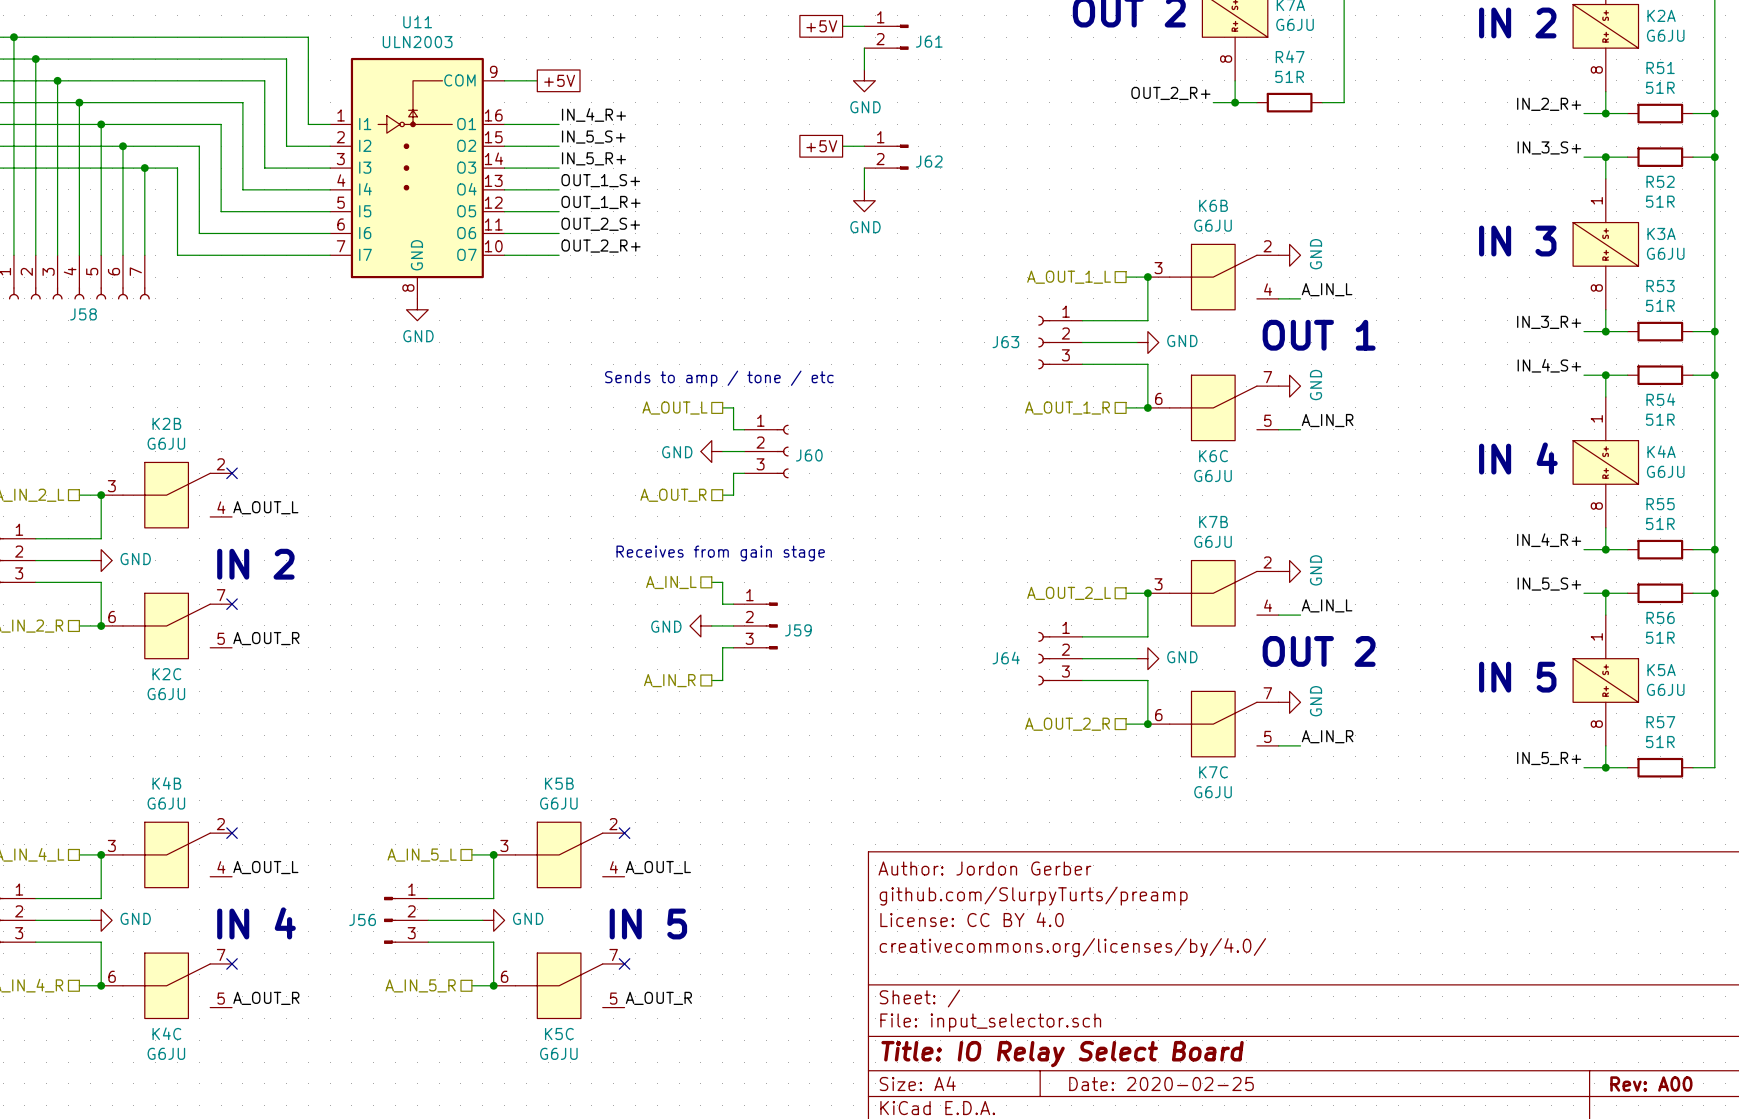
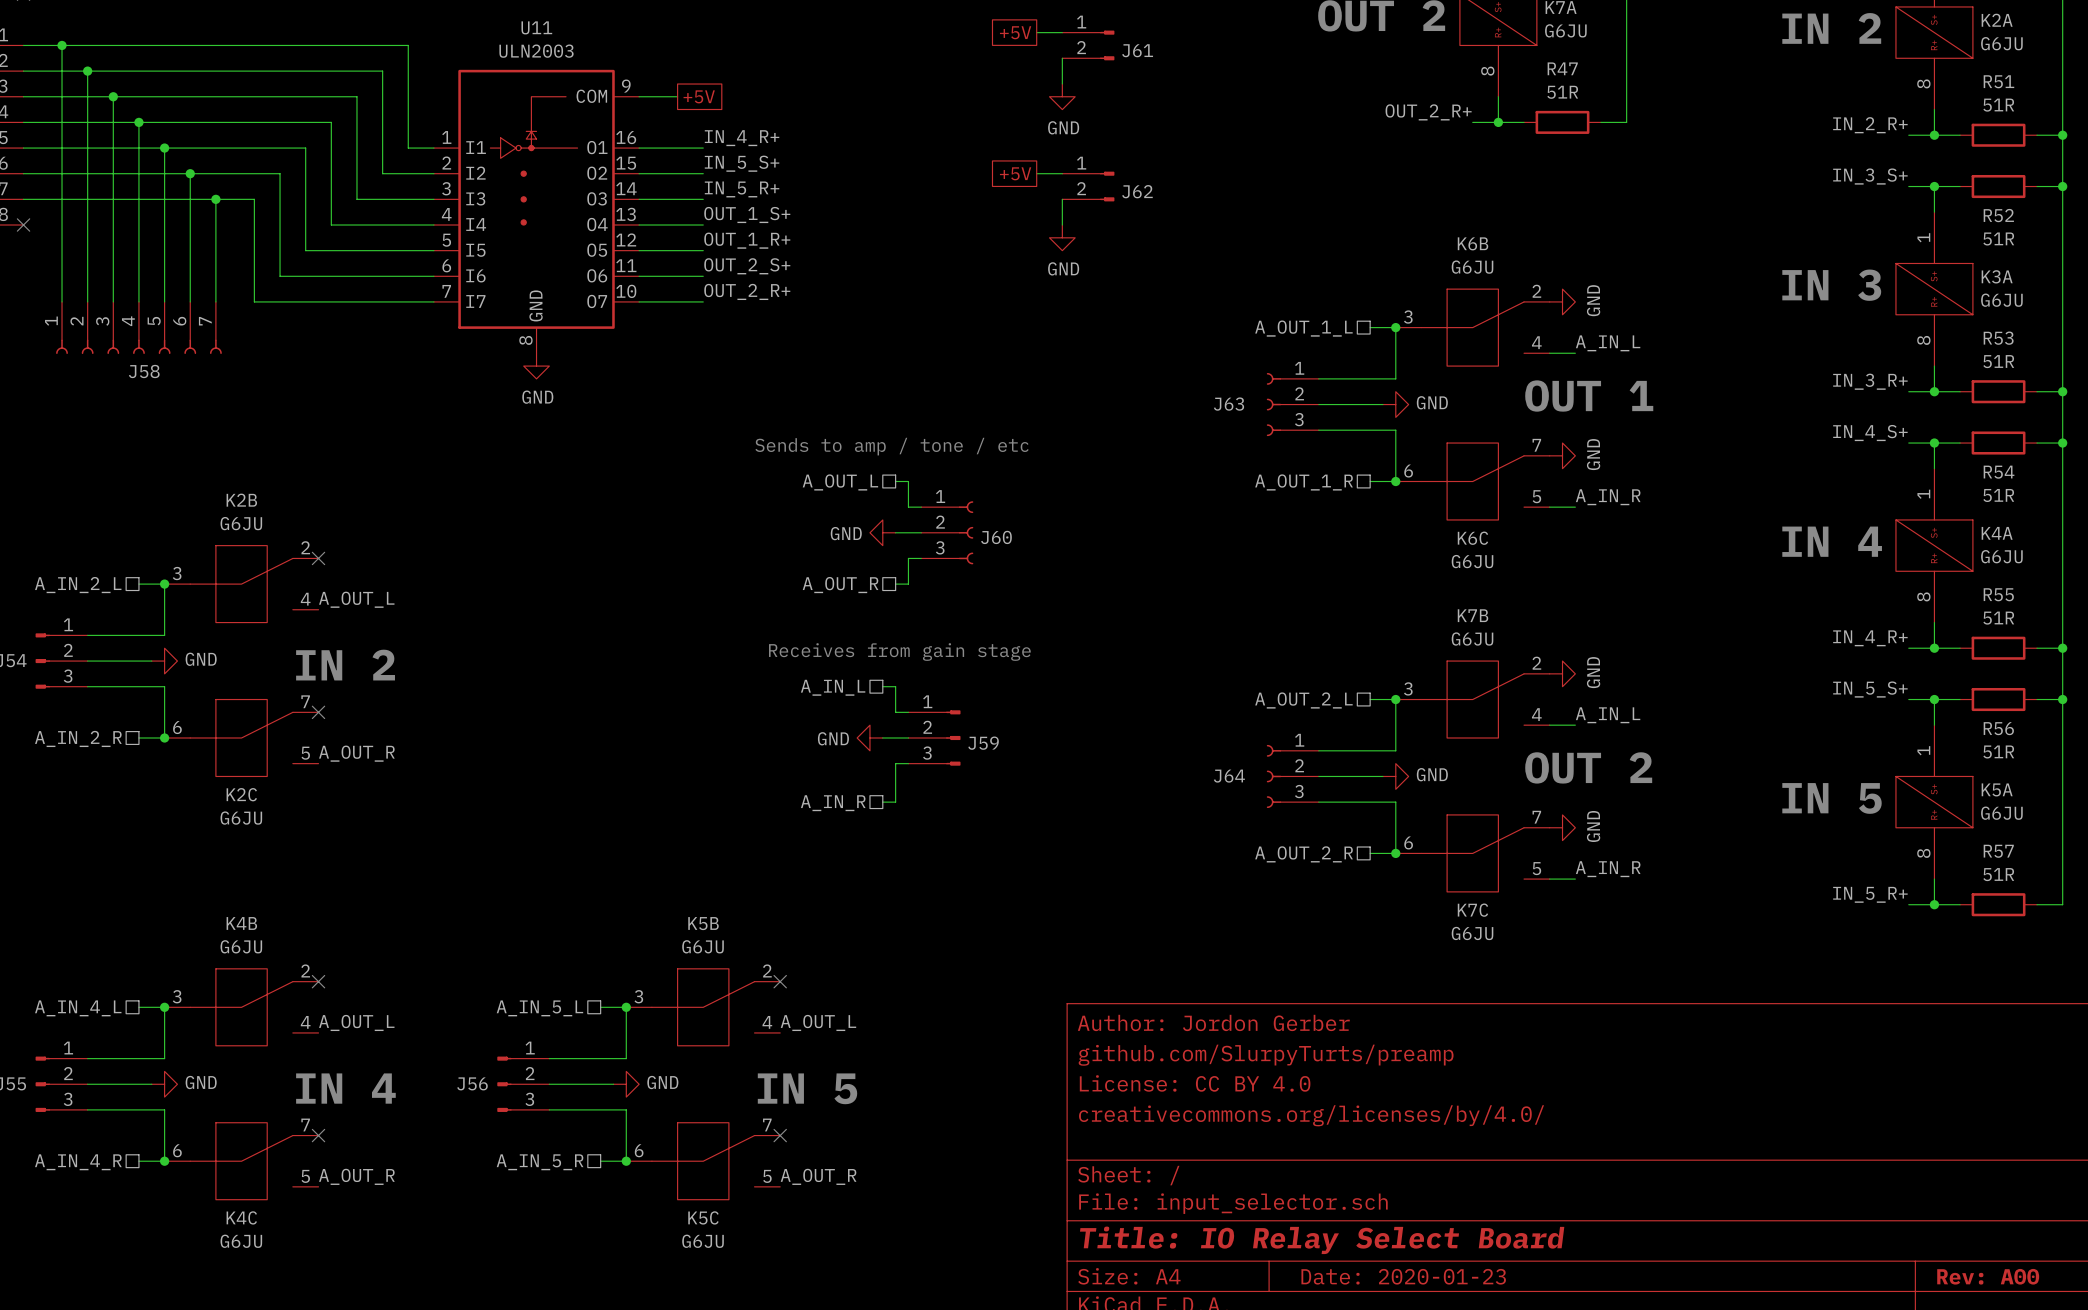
title block: Date: 2020-02-25 (1161, 1084) -> Date: 2020-01-23 (1403, 1276)

